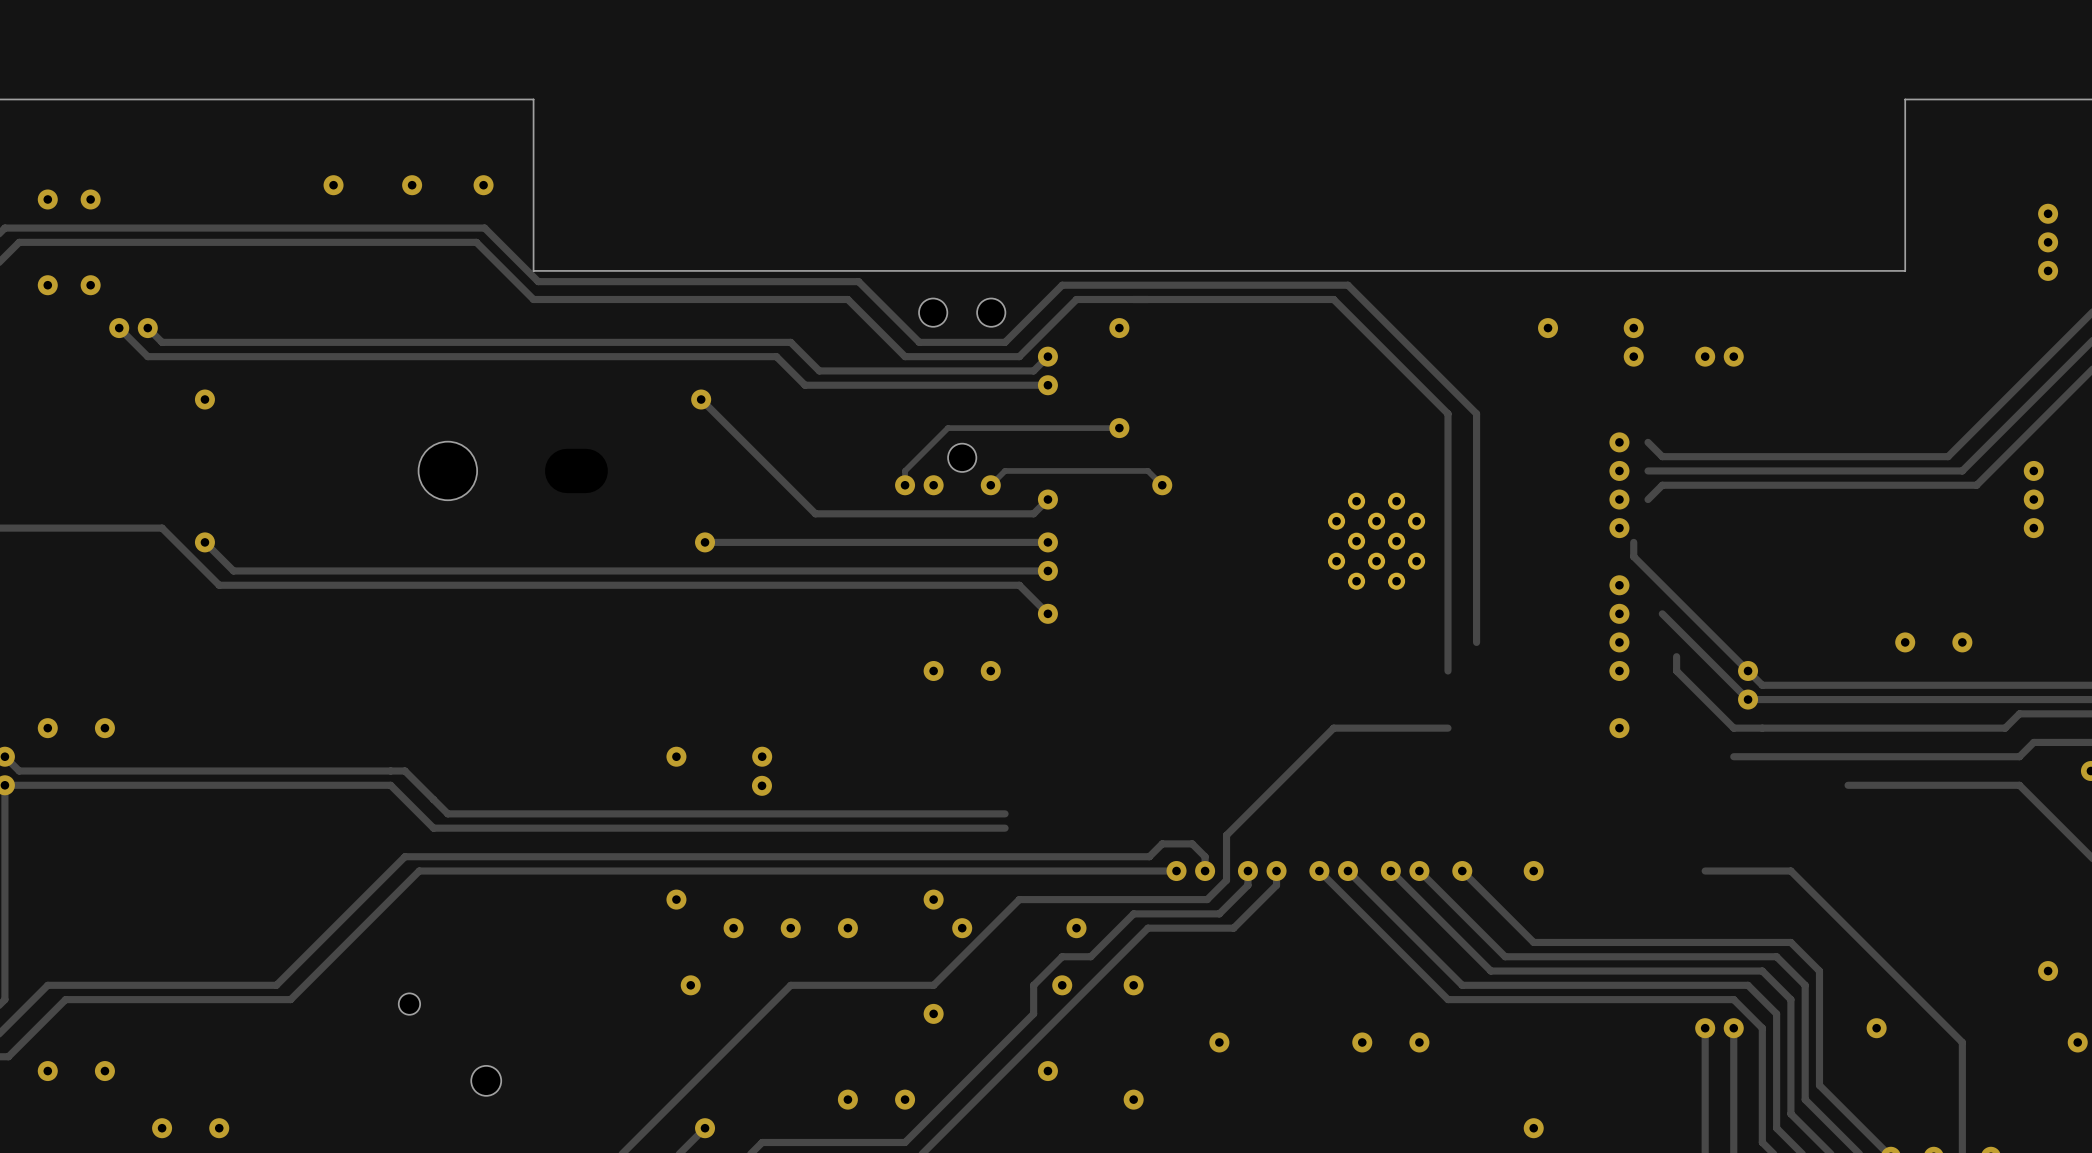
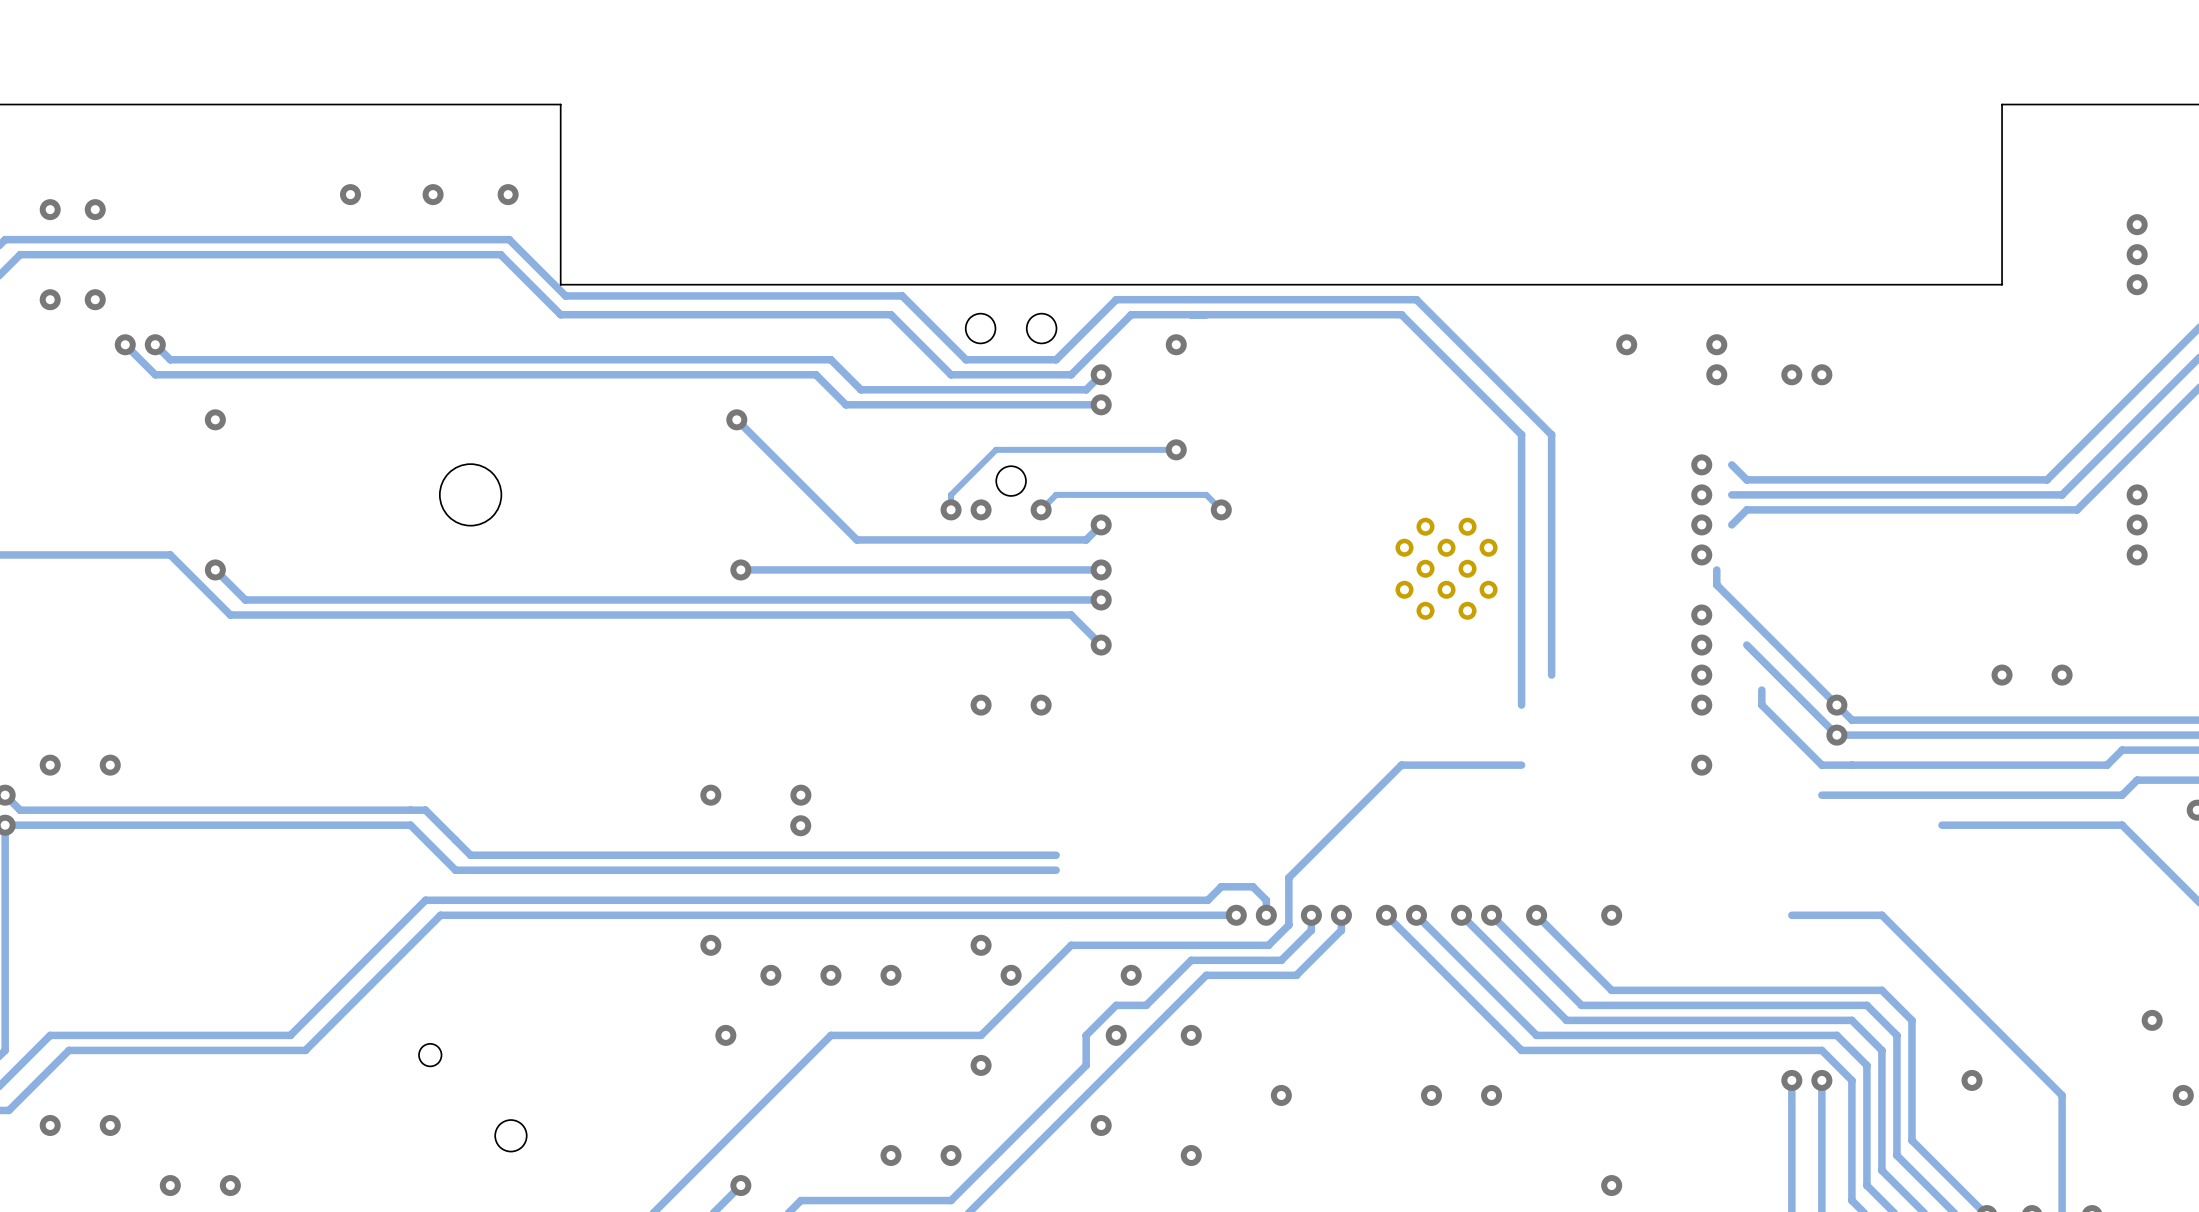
via position: (2048, 213) -> (2137, 224)
via position: (2048, 242) -> (2137, 254)
via position: (2048, 270) -> (2137, 284)

